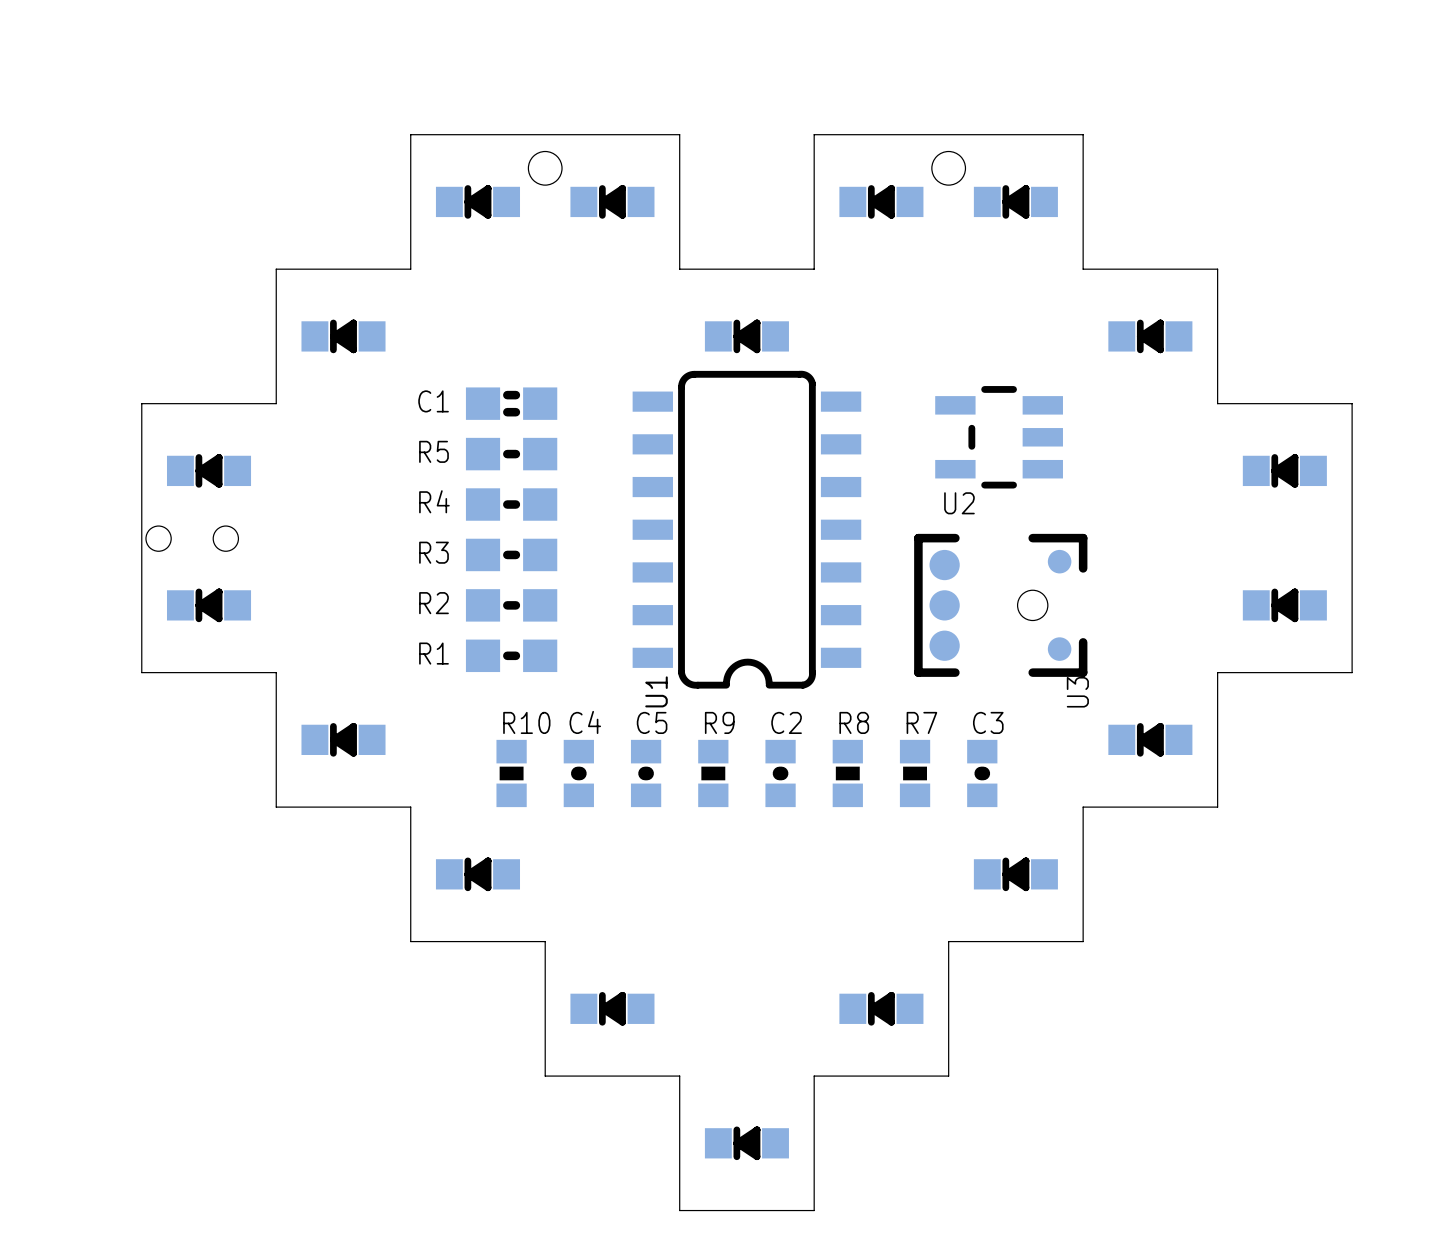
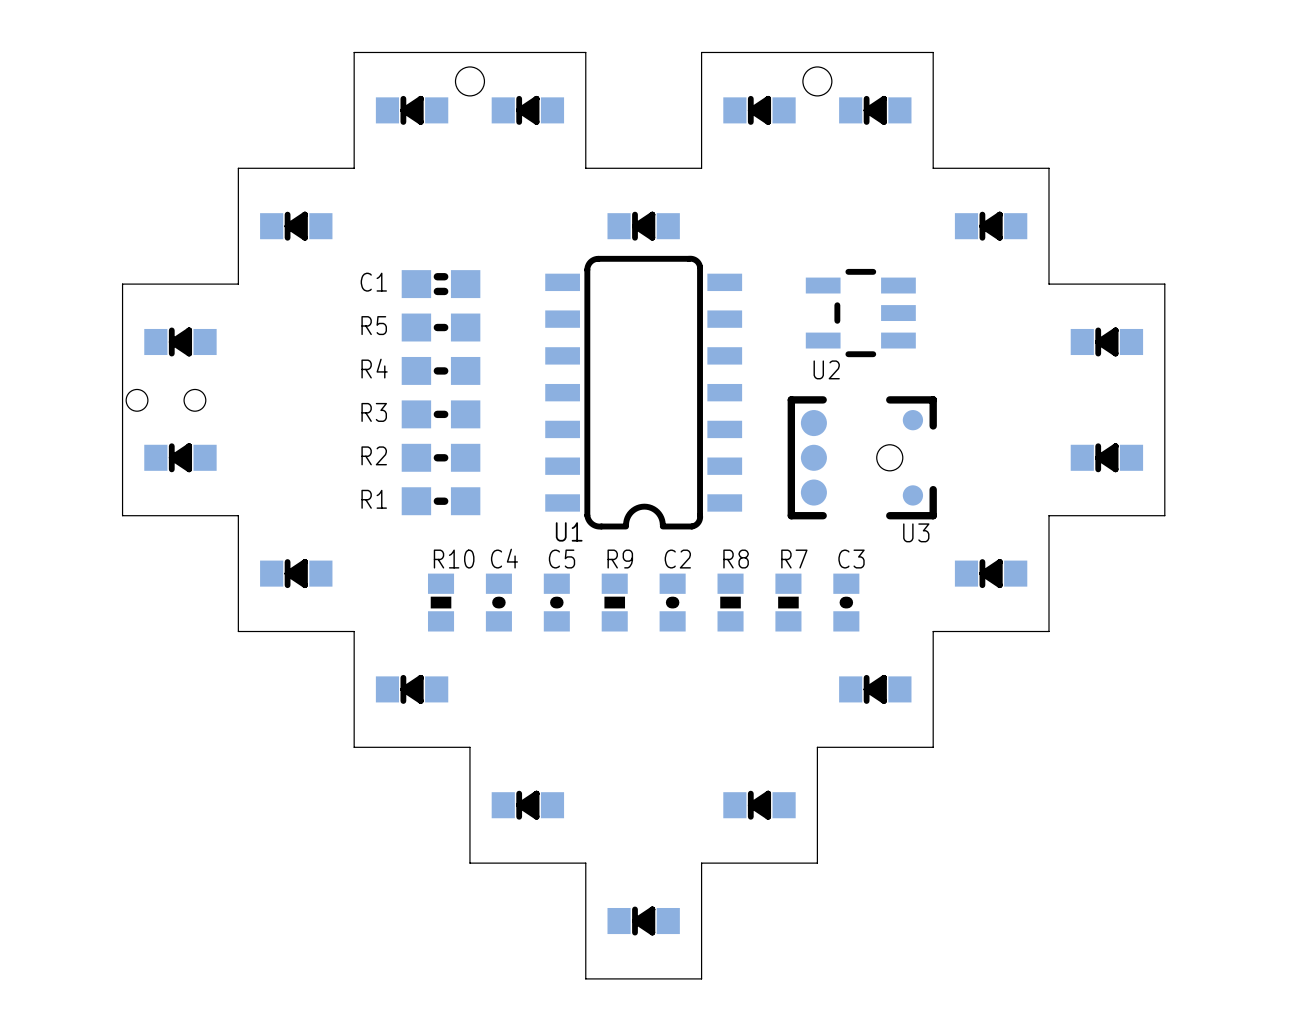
U1 name rotation: 0° (656, 691) -> 90° clockwise (569, 531)
U3 name rotation: 0° (1077, 692) -> 90° clockwise (916, 532)

